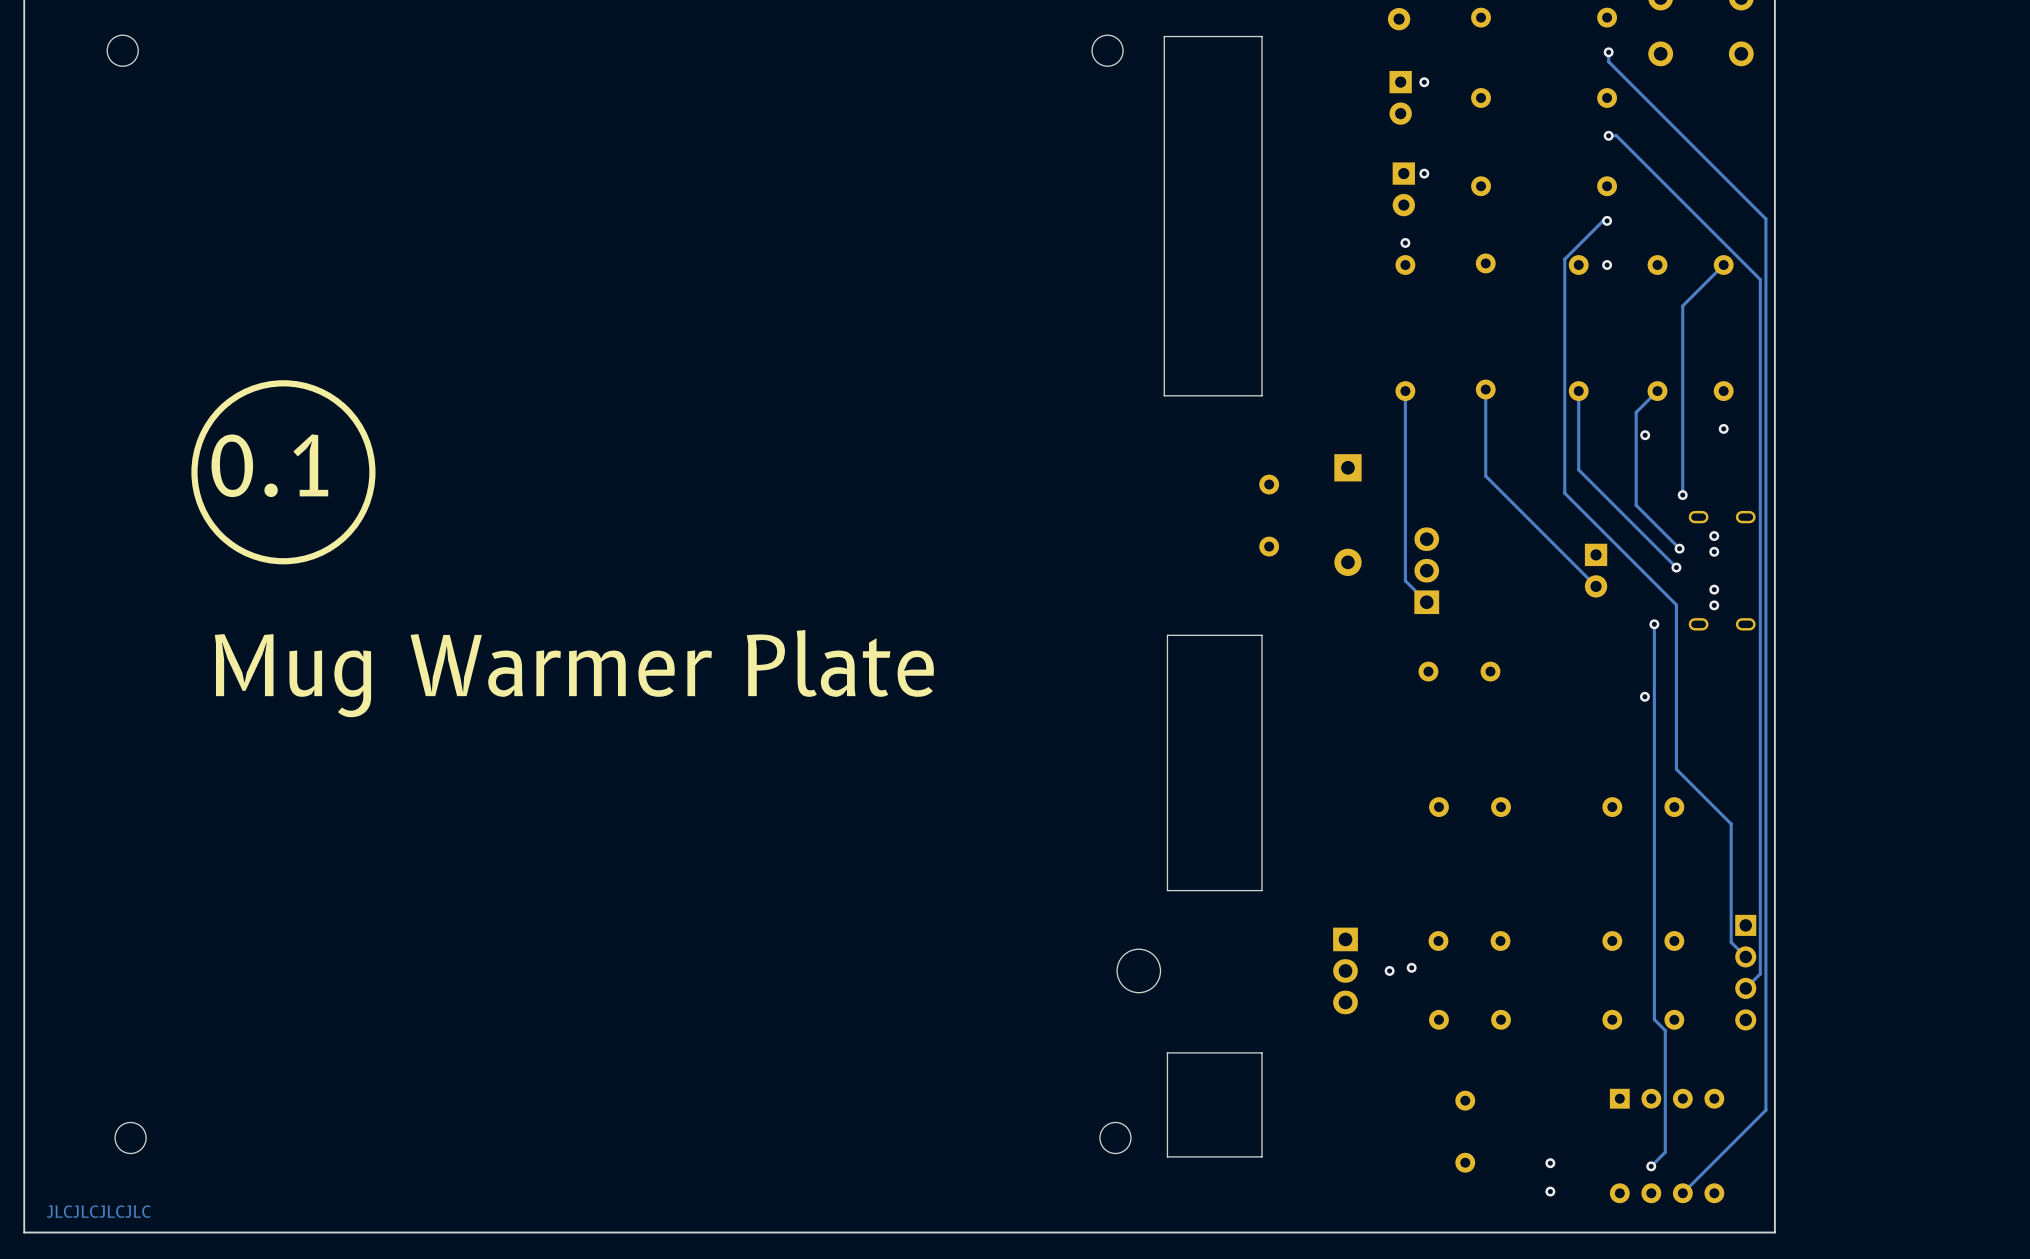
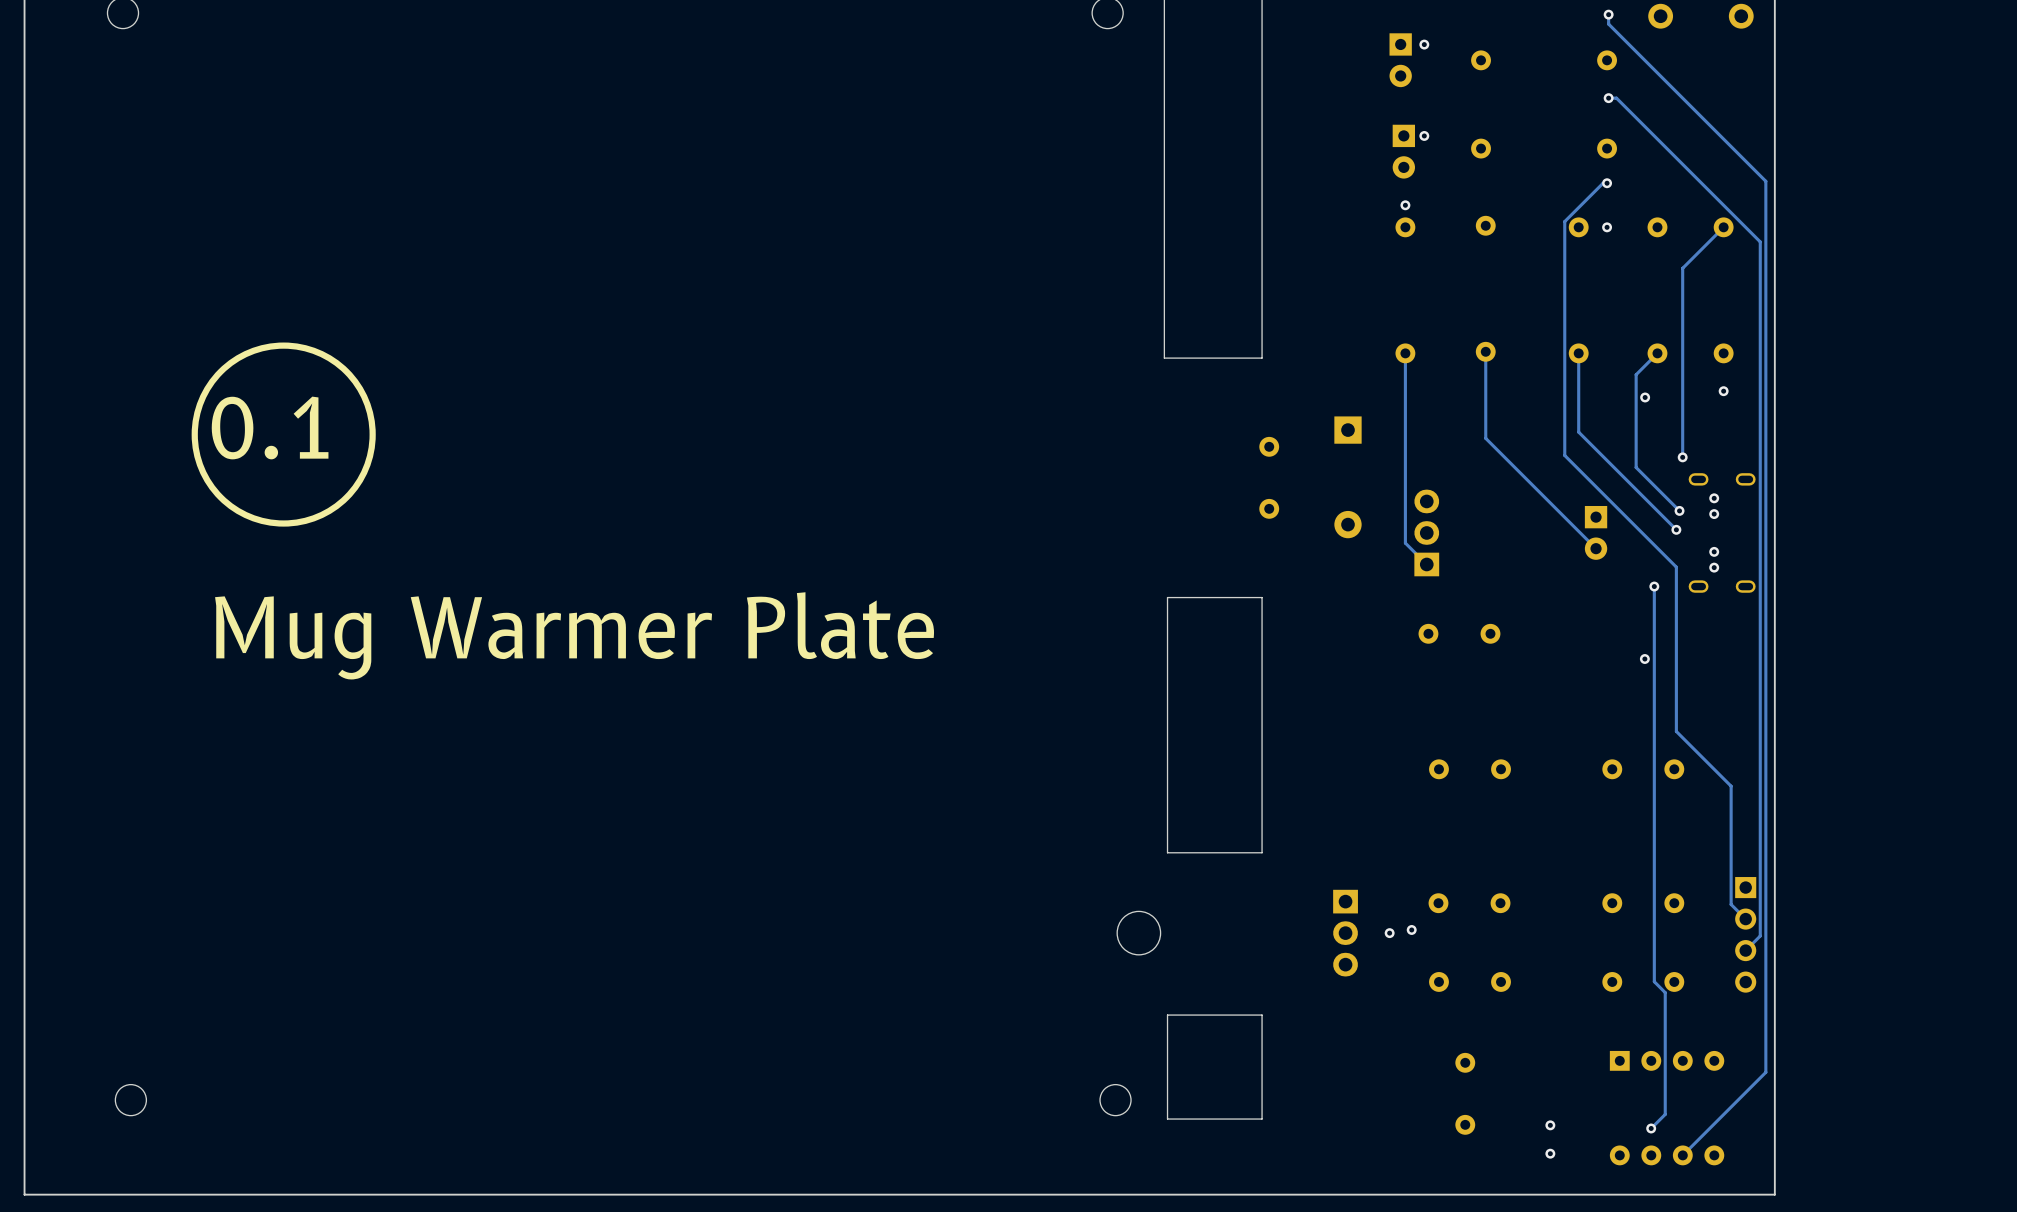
text: JLCJLCJLCJLC (98, 1211) -> none

